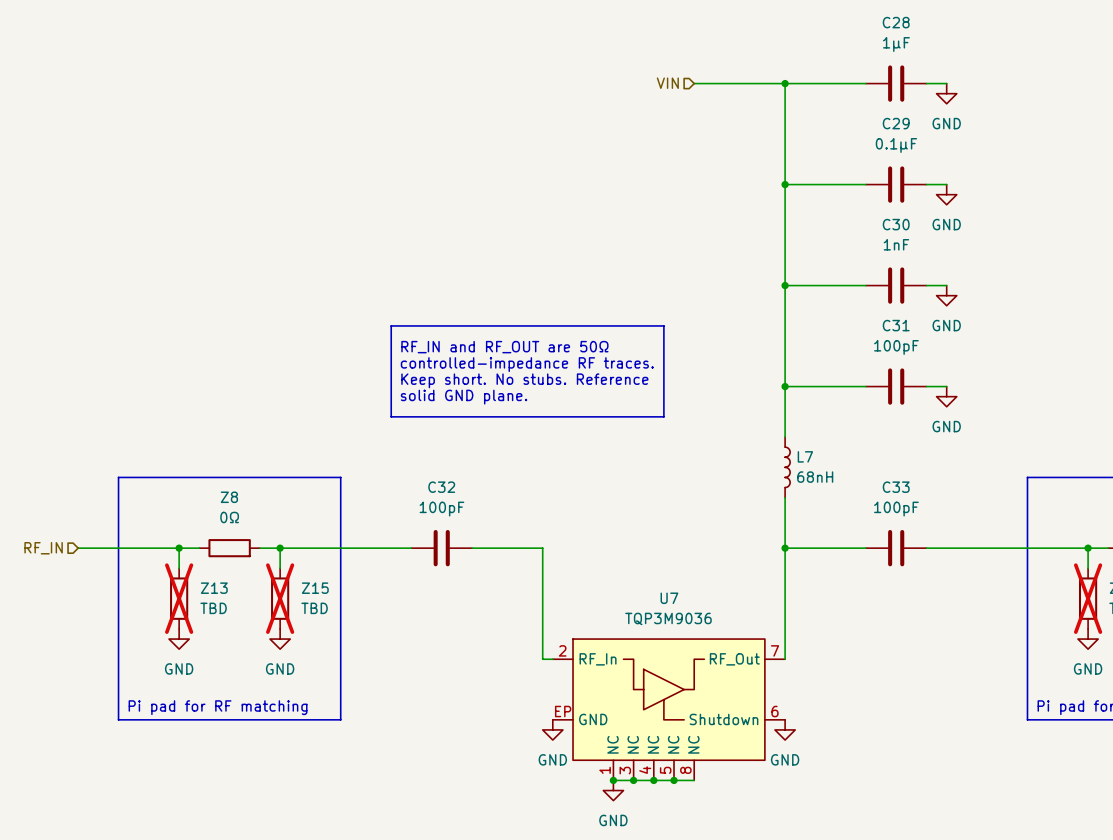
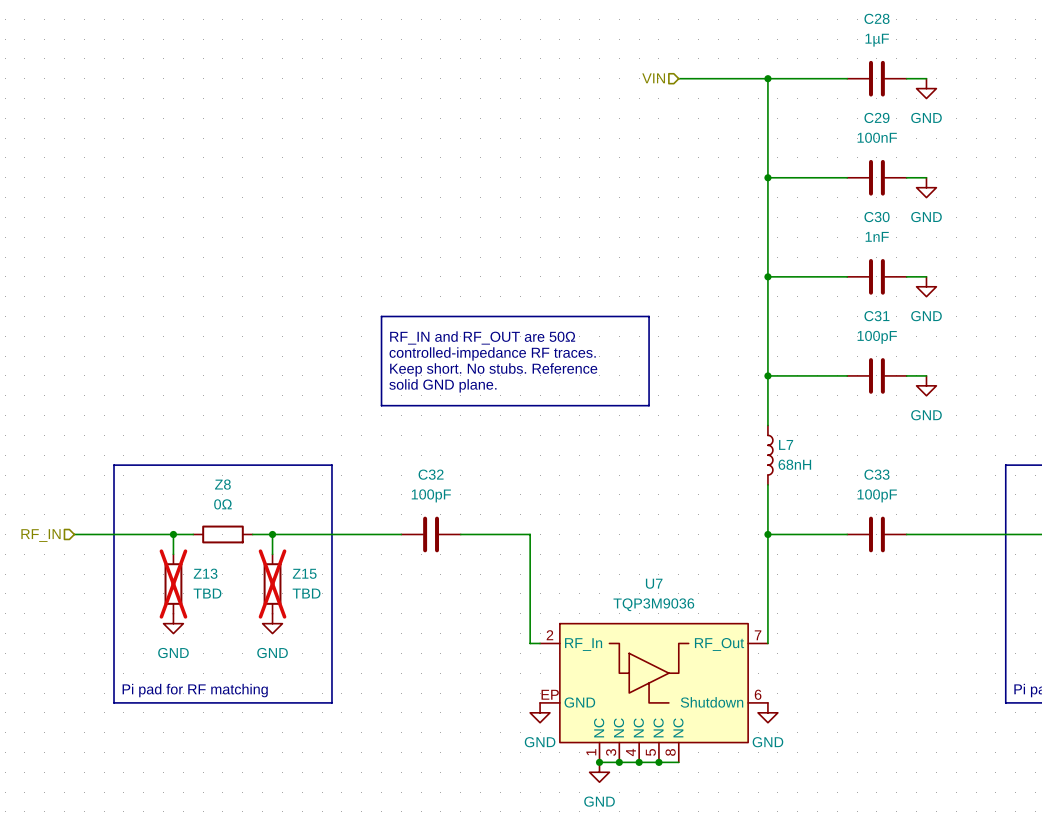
C29 value: 0.1µF (896, 145) -> 100nF (877, 137)

